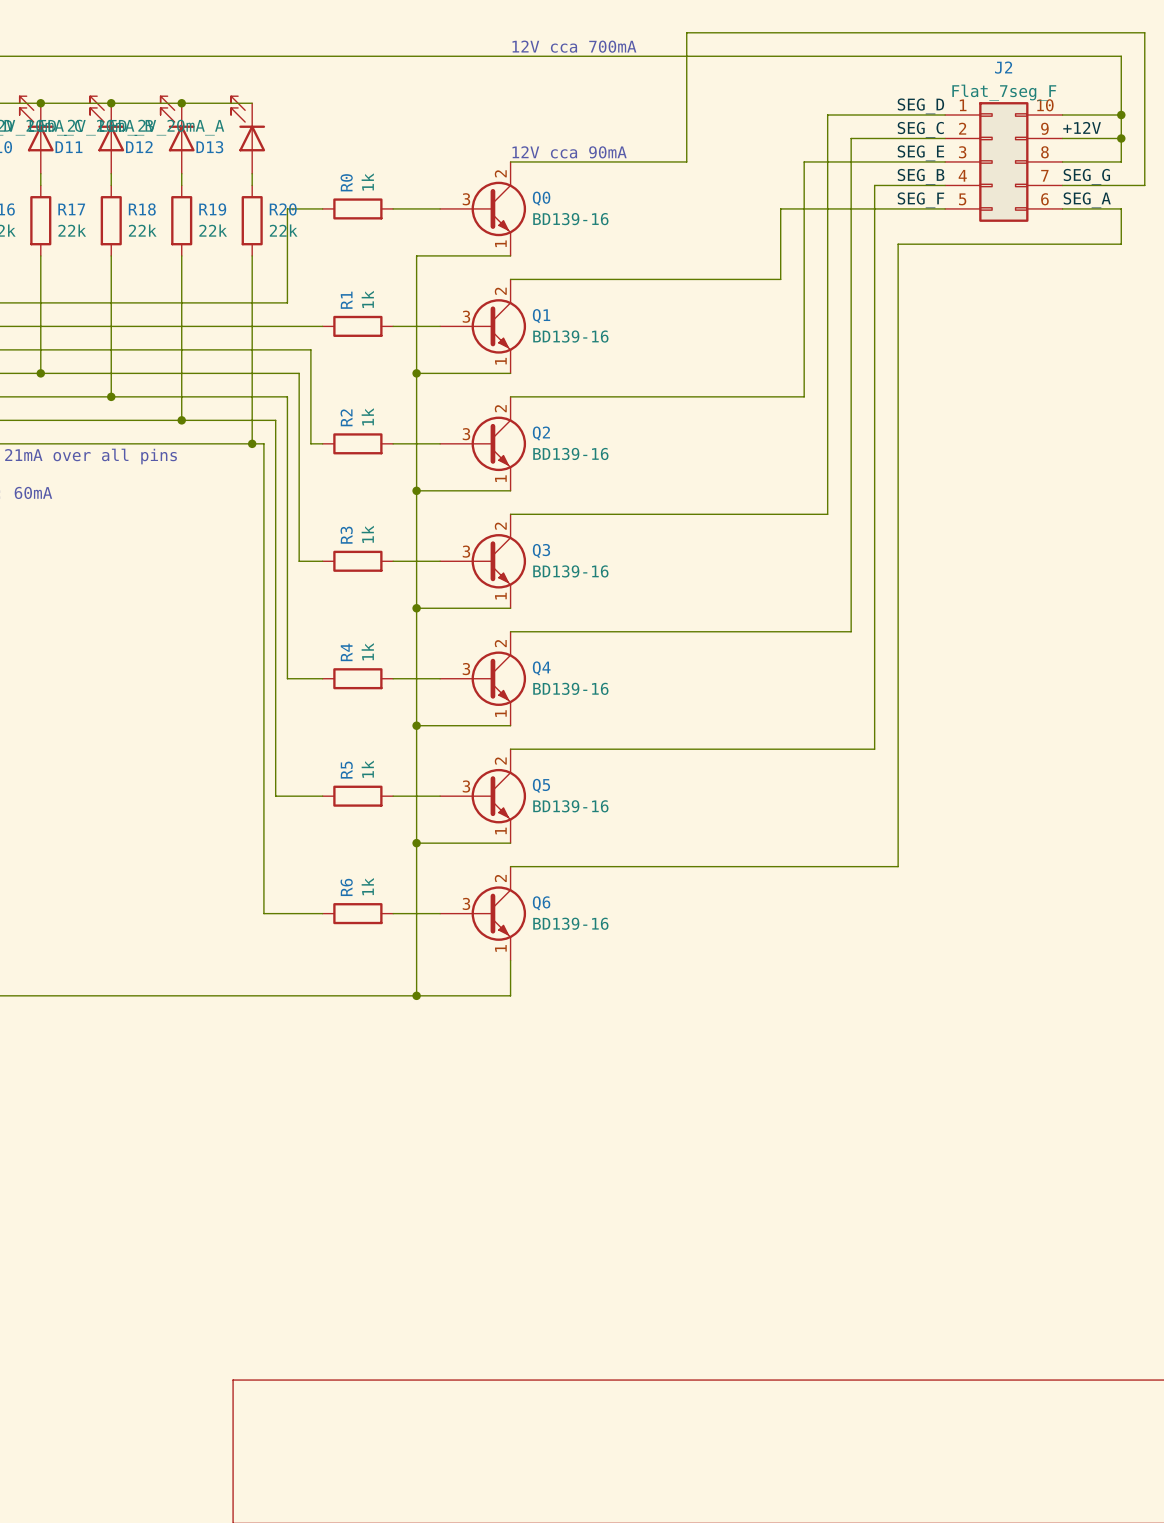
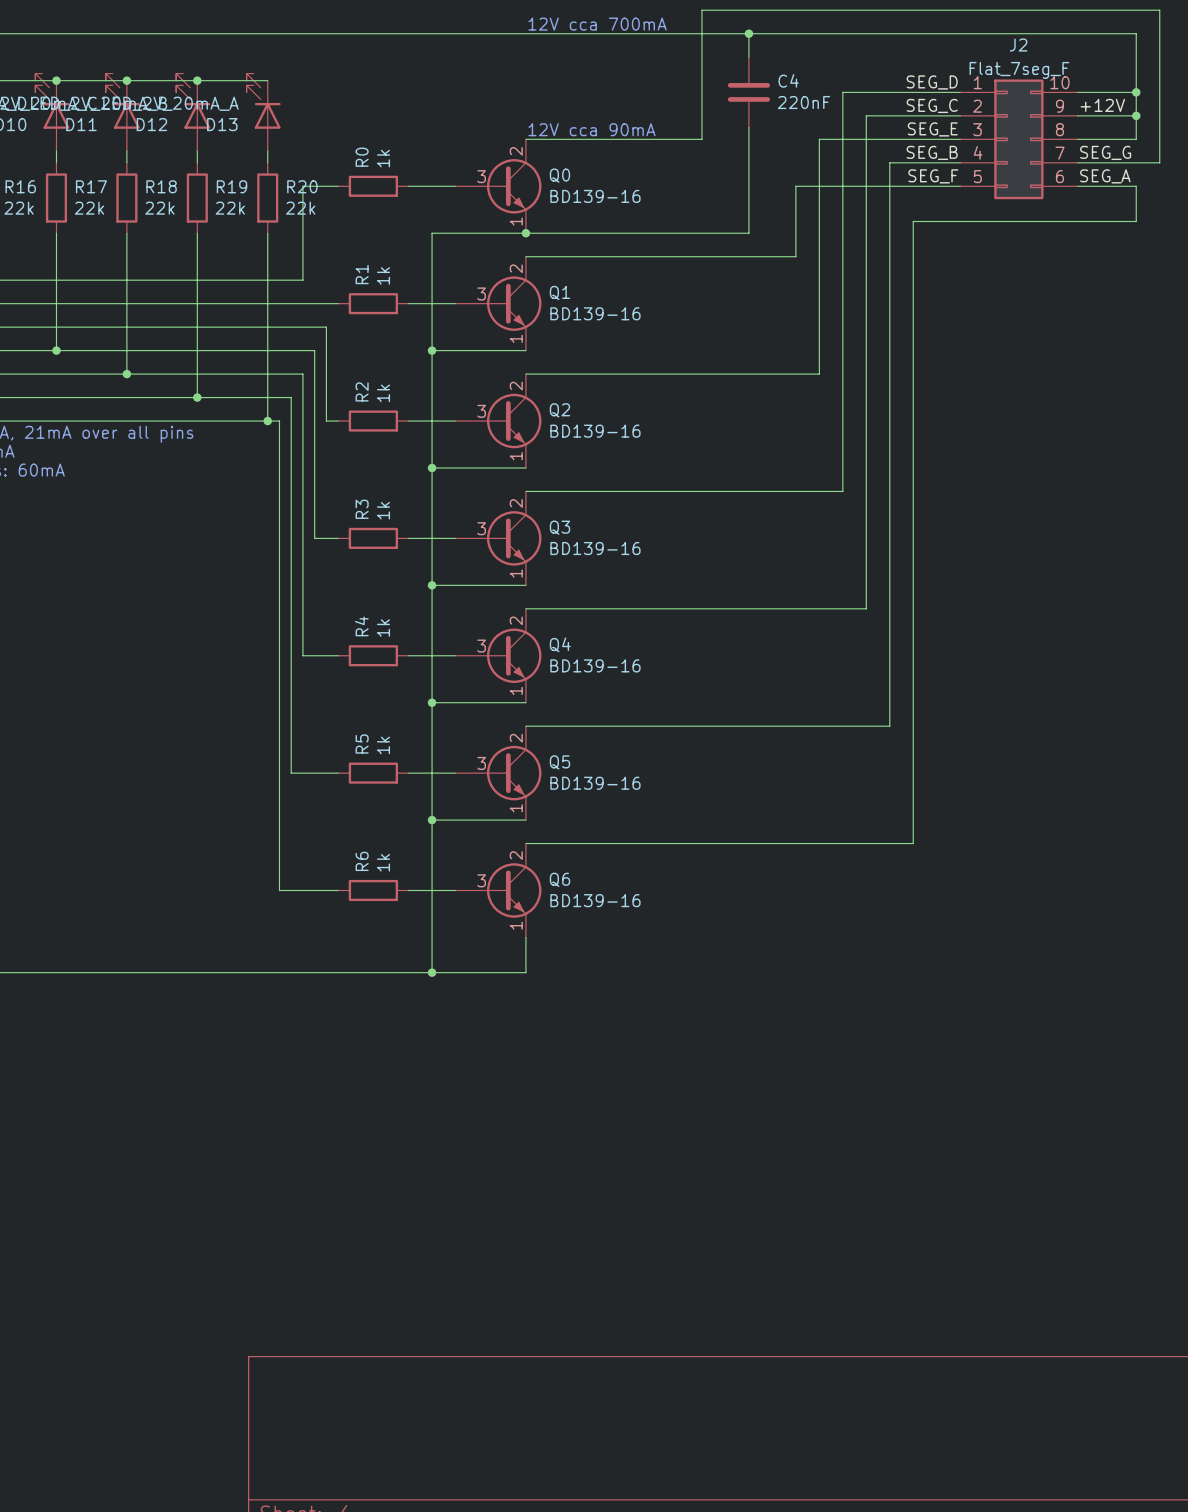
wire: none -> (748, 33) (748, 57)
junction: none -> (748, 33)
C4: none -> 220nF (748, 92)
wire: none -> (748, 127) (748, 233) (525, 233)
junction: none -> (525, 233)

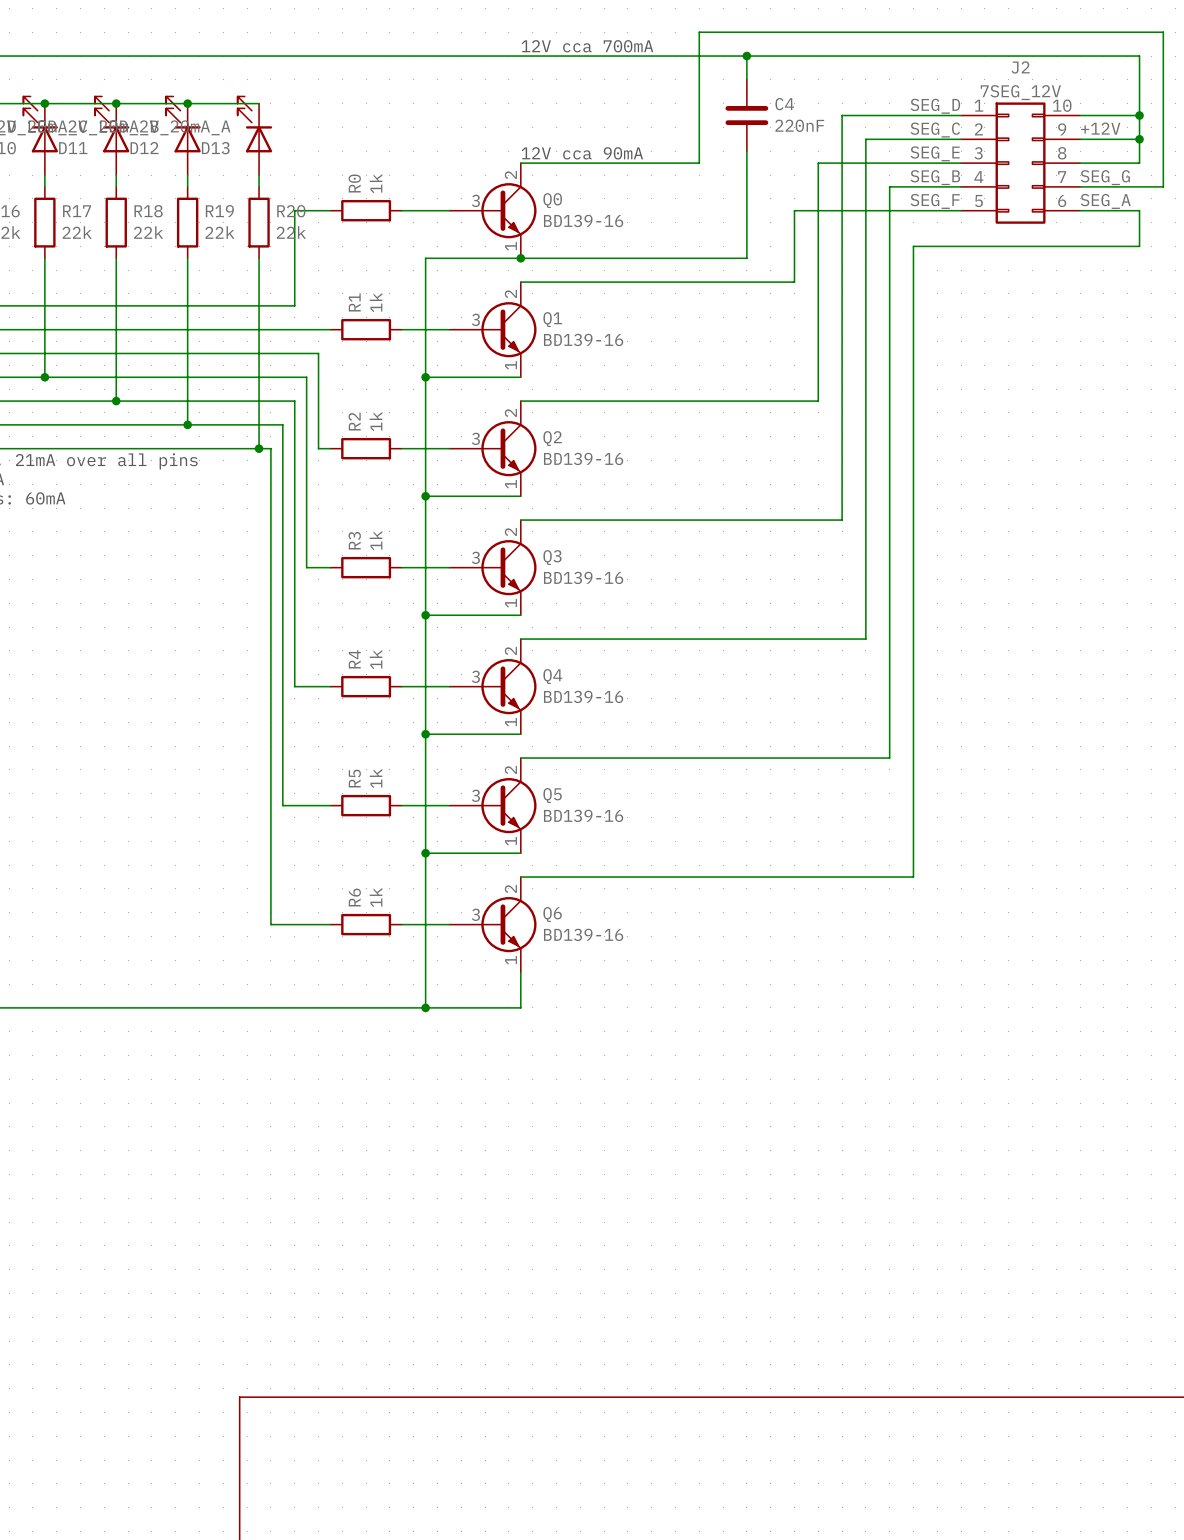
J2 value: Flat_7seg_F (1019, 70) -> 7SEG_12V (1020, 92)

